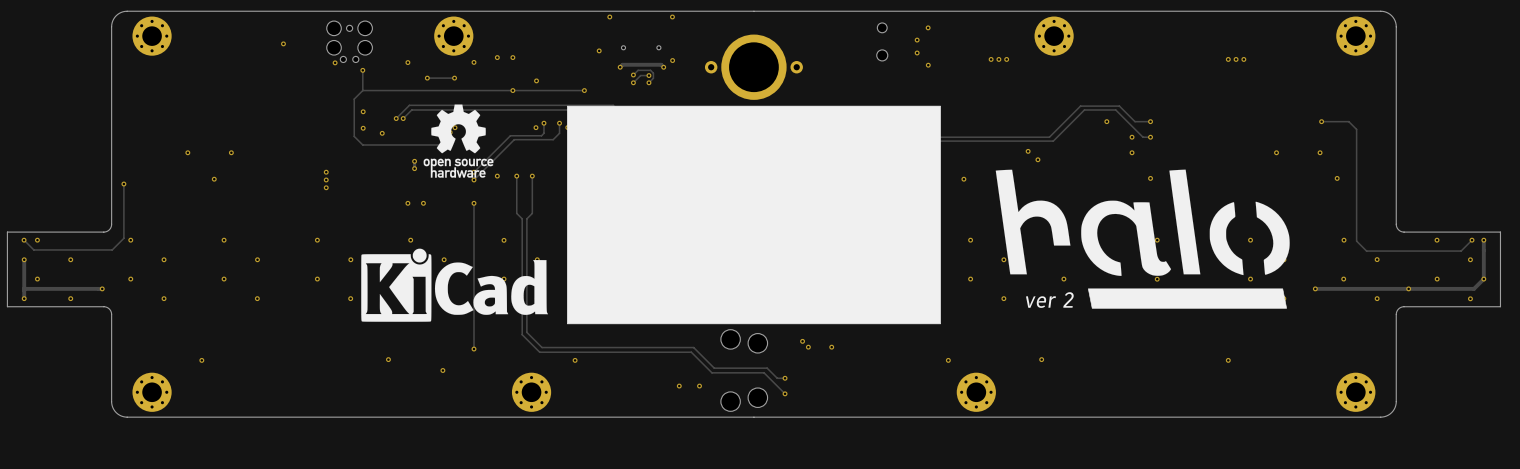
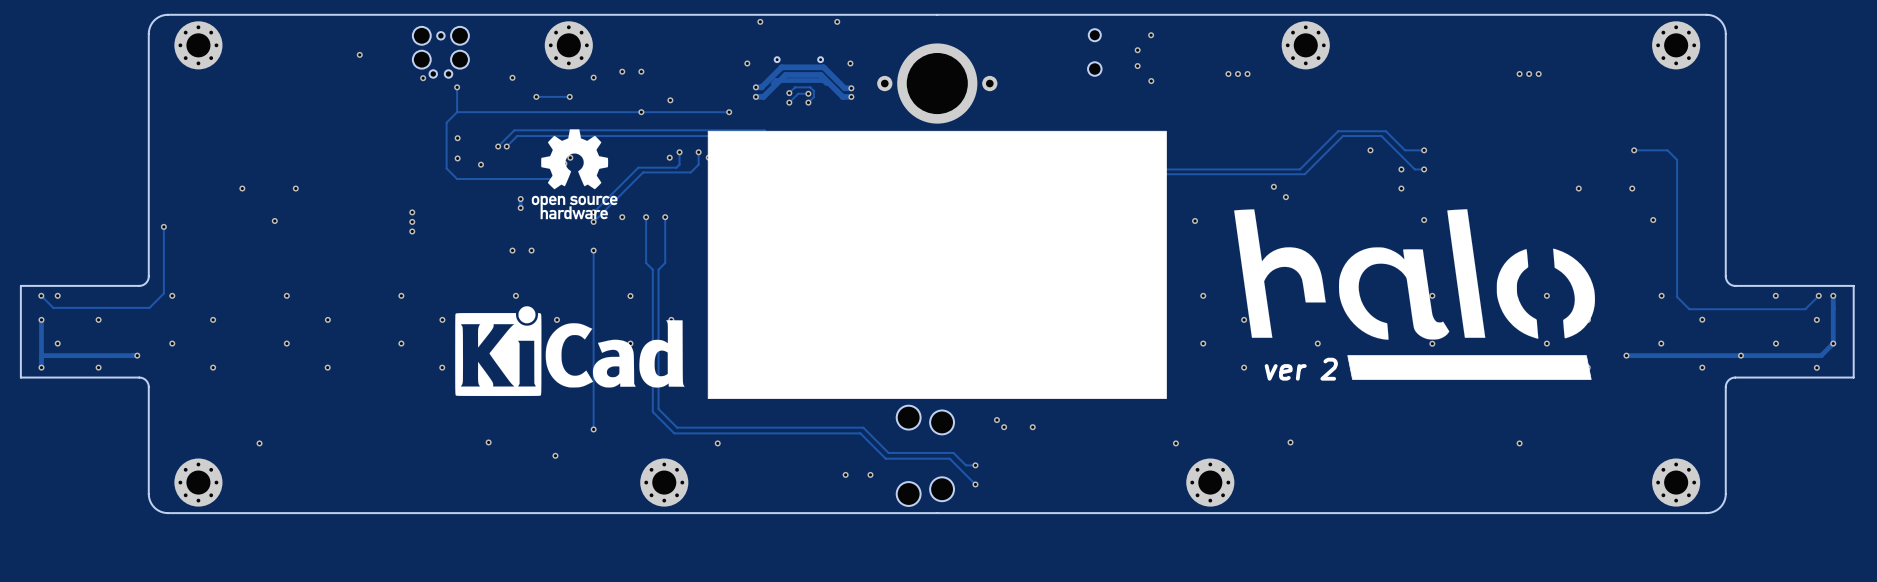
via: none -> (850, 63)
via: (672, 60) -> none
via: (620, 67) -> none
via: (663, 67) -> none
track: none -> (755, 87) (761, 87) (781, 67) (823, 67) (844, 88) (851, 88)
via: none -> (755, 87)
via: none -> (851, 88)
via: none -> (755, 96)
track: none -> (851, 96) (842, 96) (820, 74) (785, 74) (763, 96) (755, 96)
via: none -> (851, 96)

